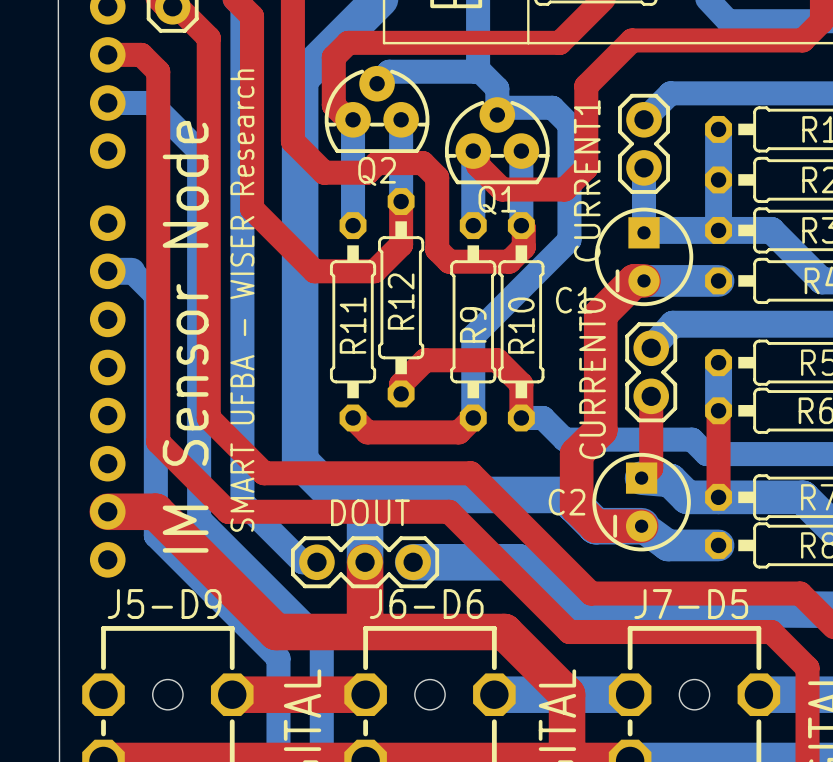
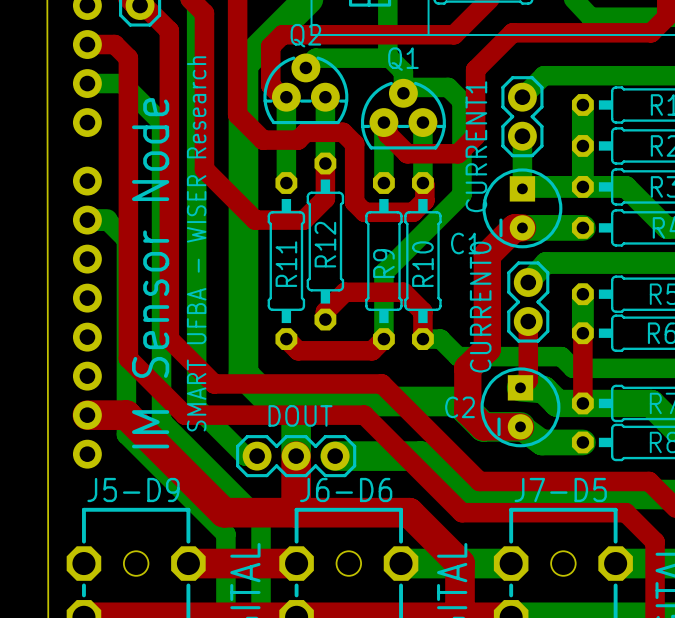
Q2 name position: Q2 (377, 171) -> Q2 (305, 35)
Q1 name position: Q1 (497, 200) -> Q1 (403, 59)

